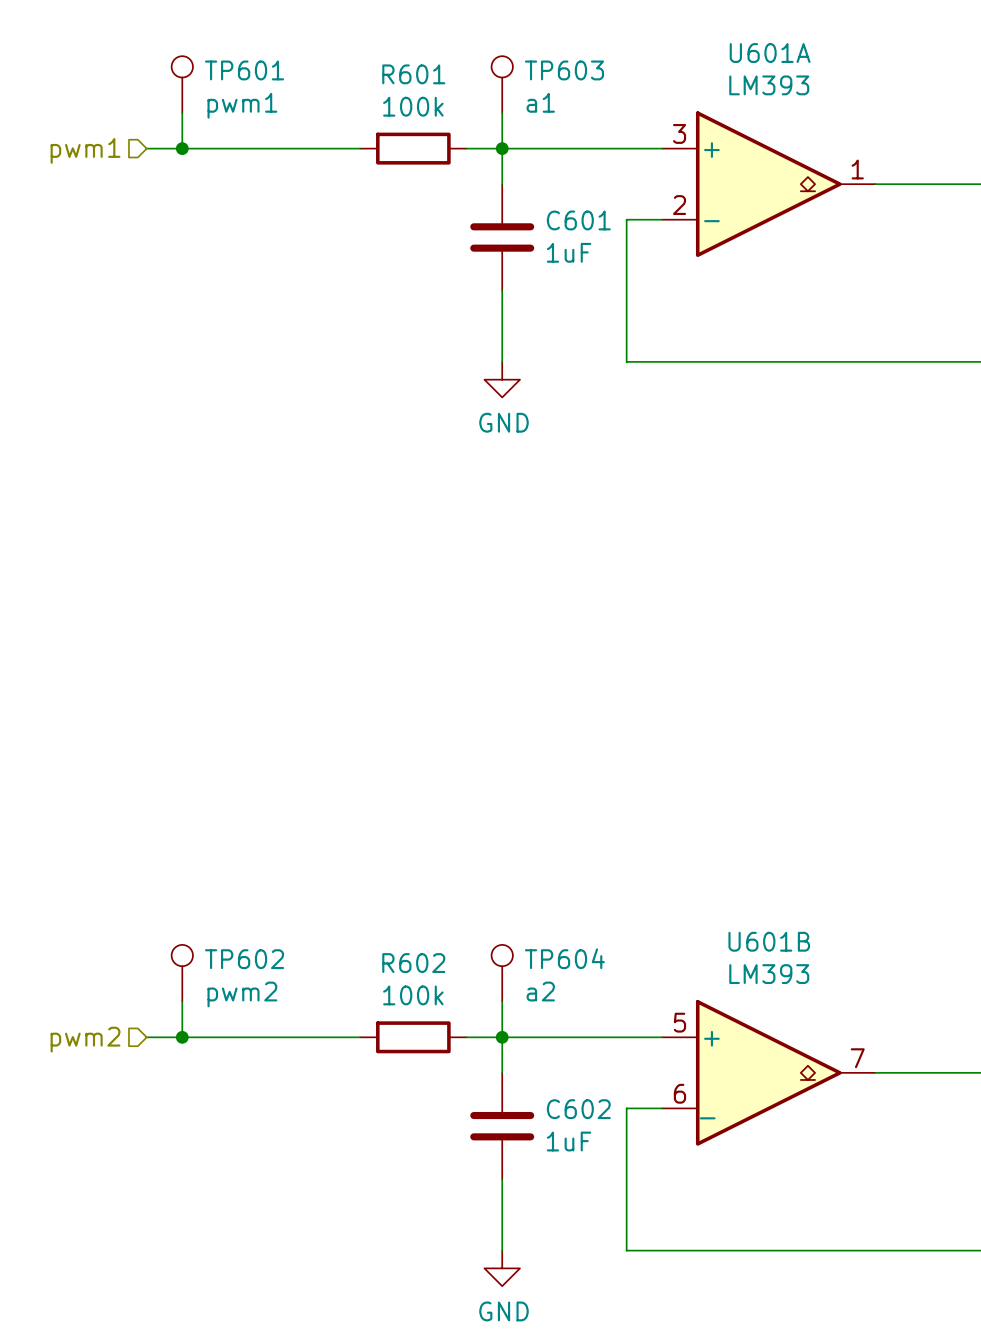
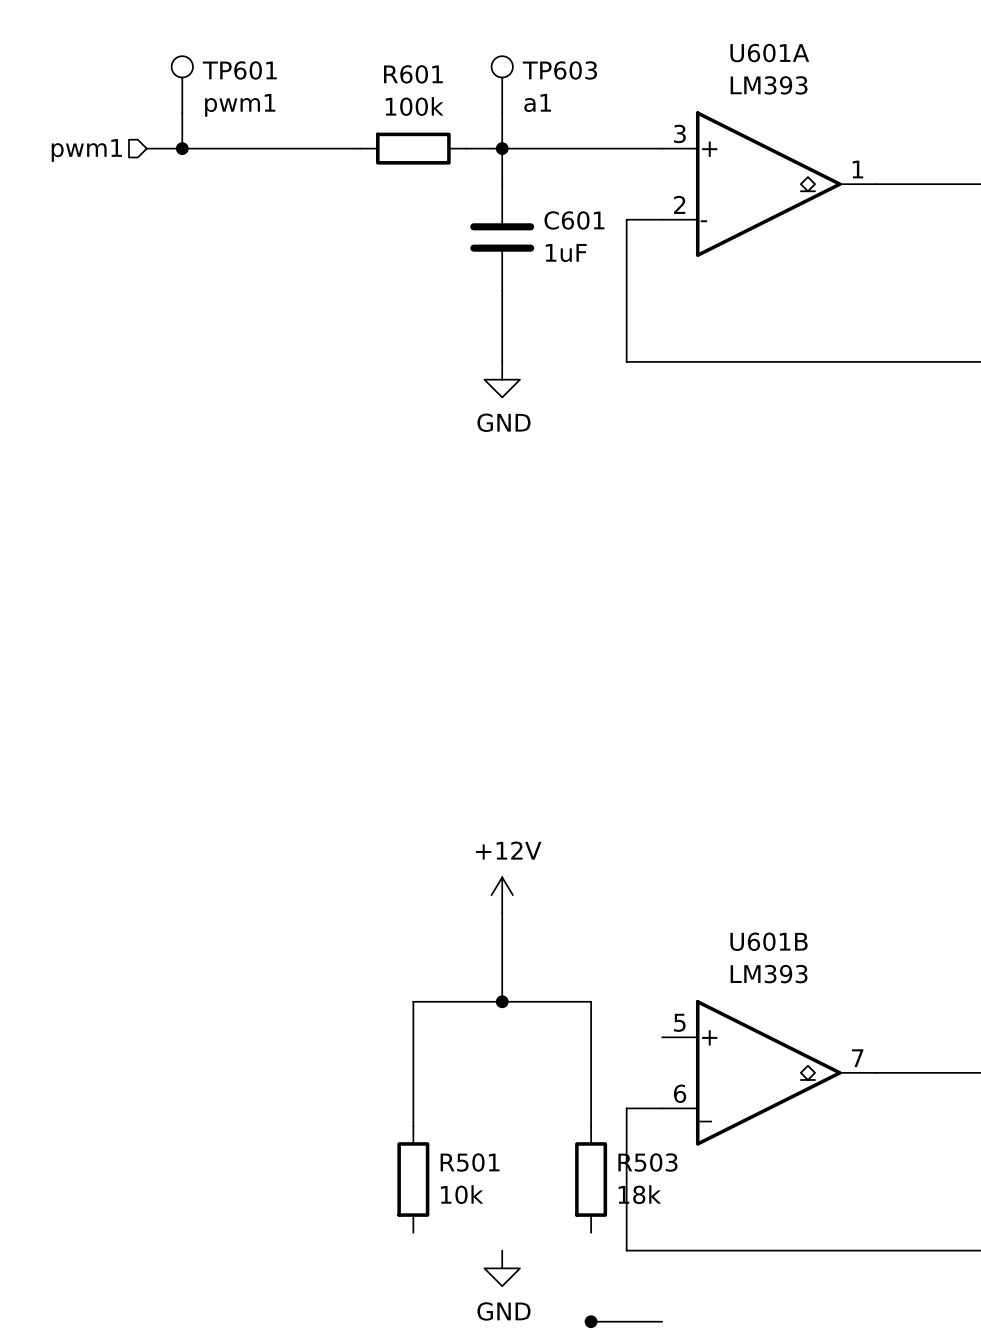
power symbol: none -> +12V (502, 895)
TP602: pwm2 (182, 973) -> none
TP604: a2 (502, 973) -> none
wire: (182, 1001) (182, 1037) -> none
wire: (502, 1001) (502, 1072) -> (502, 1001) (502, 912)
wire: (146, 1037) (360, 1037) -> none
junction: (182, 1037) -> none
R602: 100k (413, 1037) -> none
wire: (466, 1037) (662, 1037) -> none
junction position: (502, 1037) -> (502, 1001)
hierarchical label: pwm2 (85, 1039) -> none
wire: none -> (413, 1126) (413, 1001) (591, 1001) (591, 1126)
C602: 1uF (502, 1126) -> none
R501: none -> 10k (413, 1179)
wire: (502, 1179) (502, 1250) -> none
R503: none -> 18k (591, 1179)
wire: none -> (591, 1321) (662, 1321)
junction: none -> (591, 1321)

